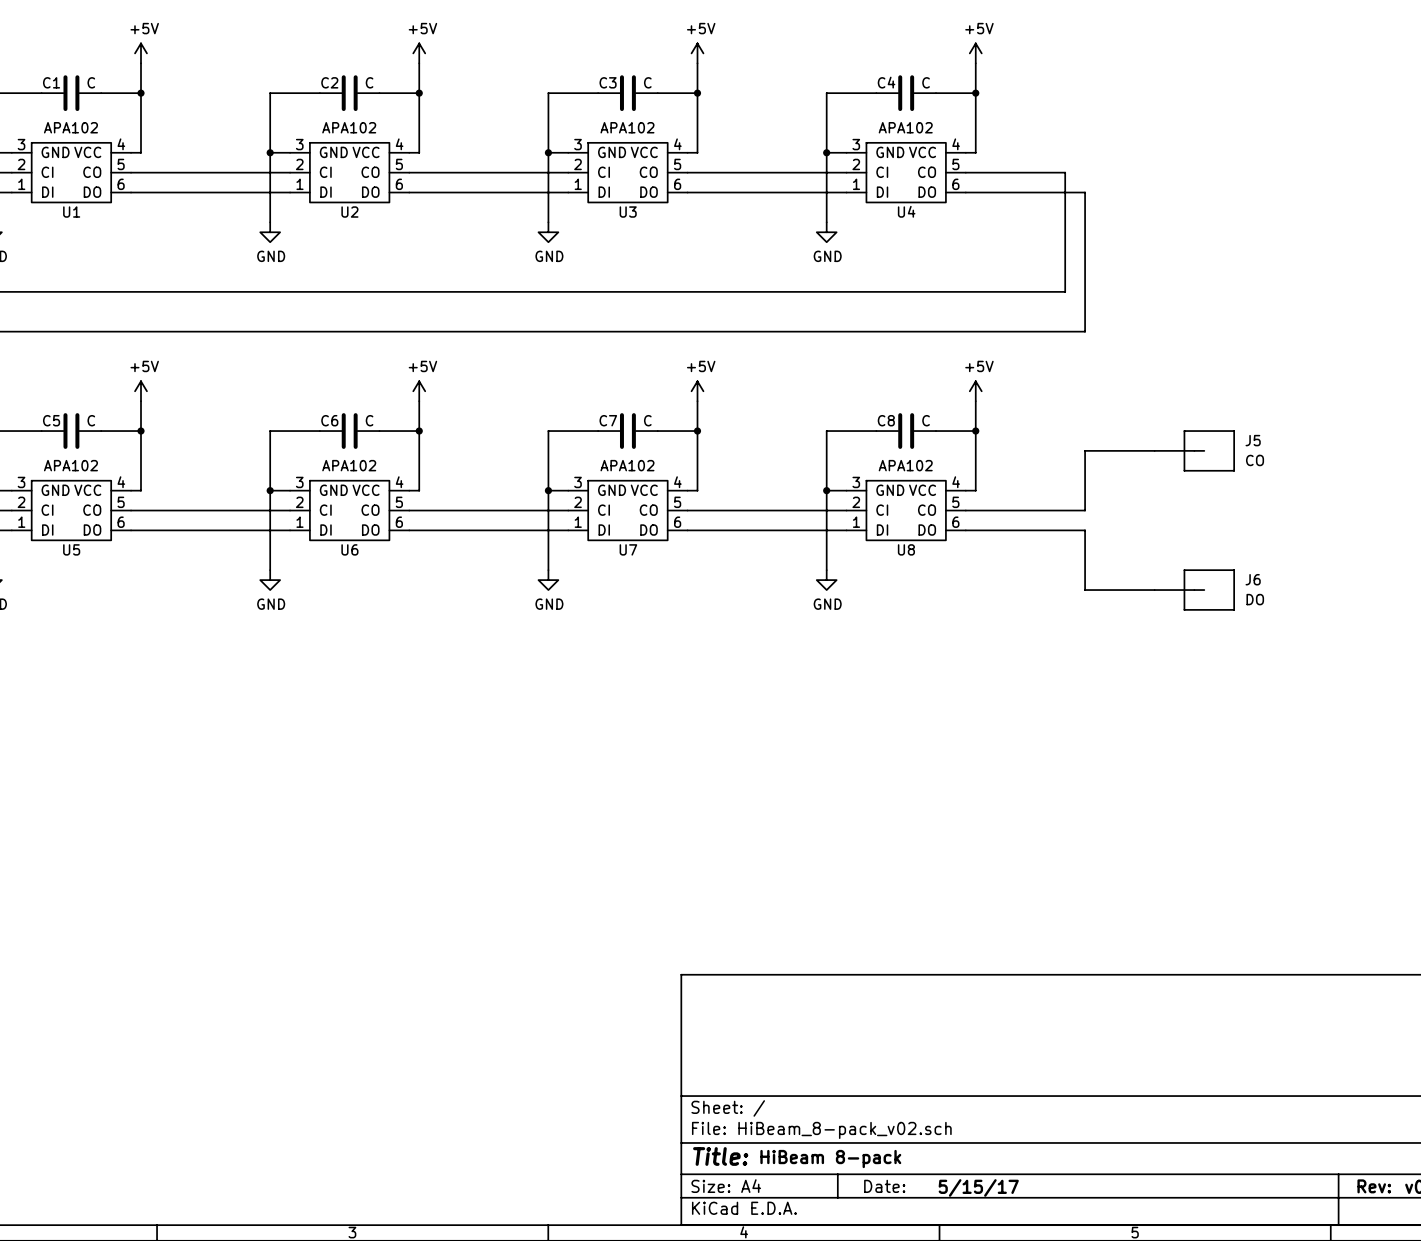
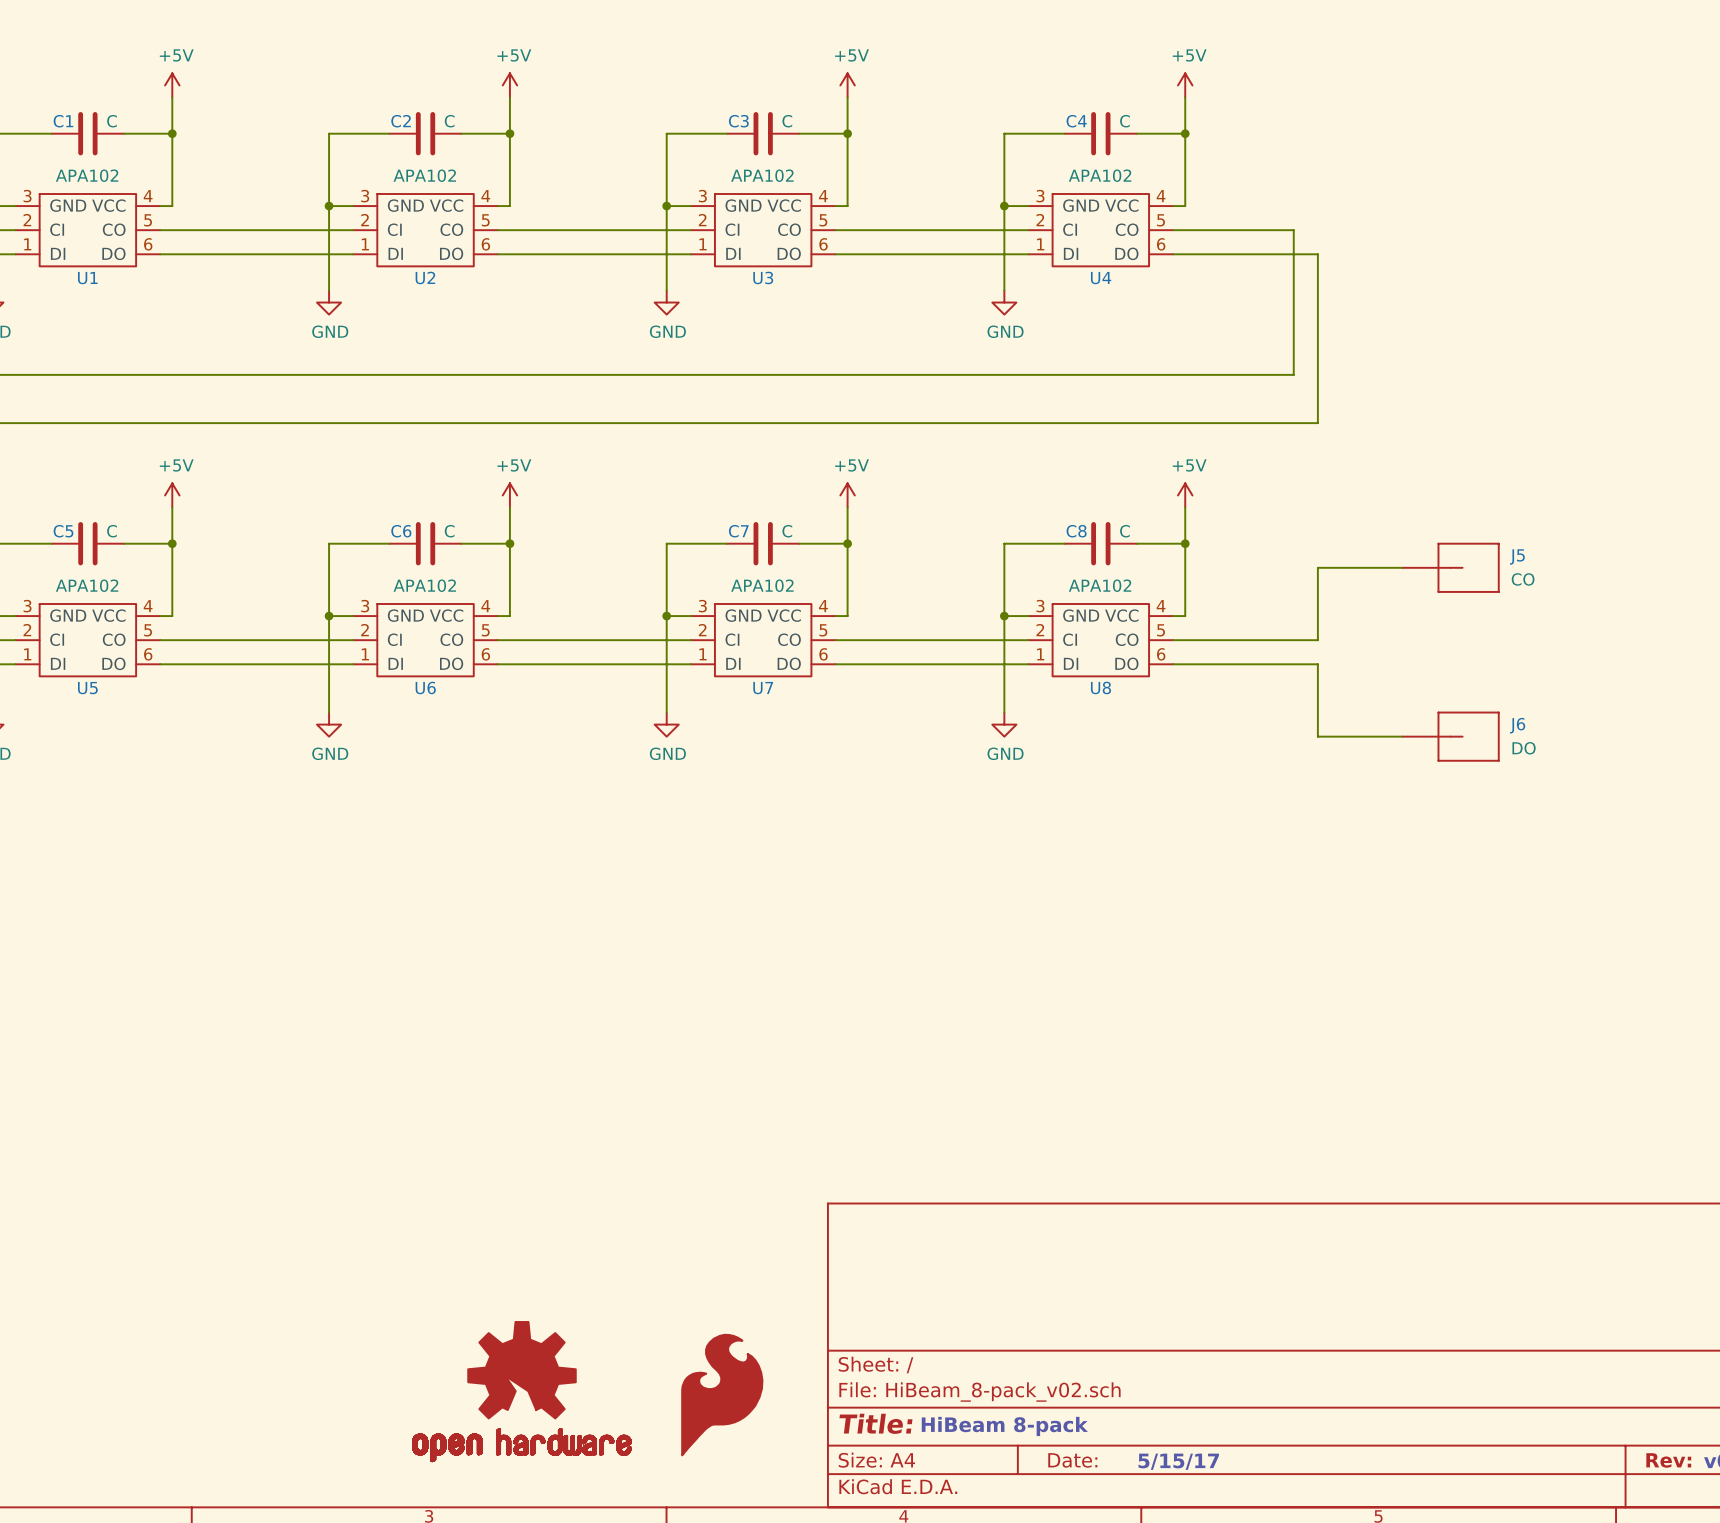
part: none -> (521, 1391)
part: none -> (722, 1395)

